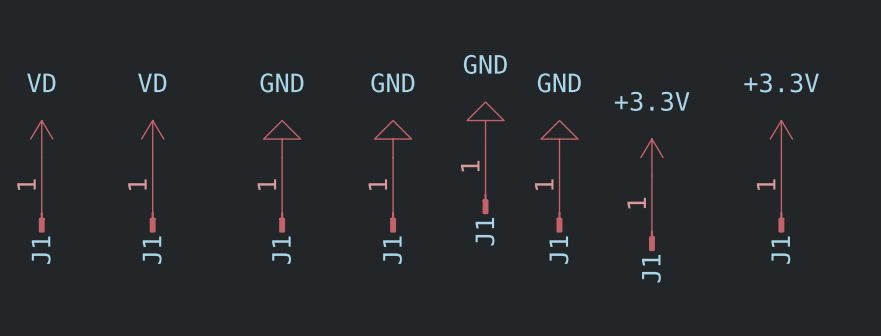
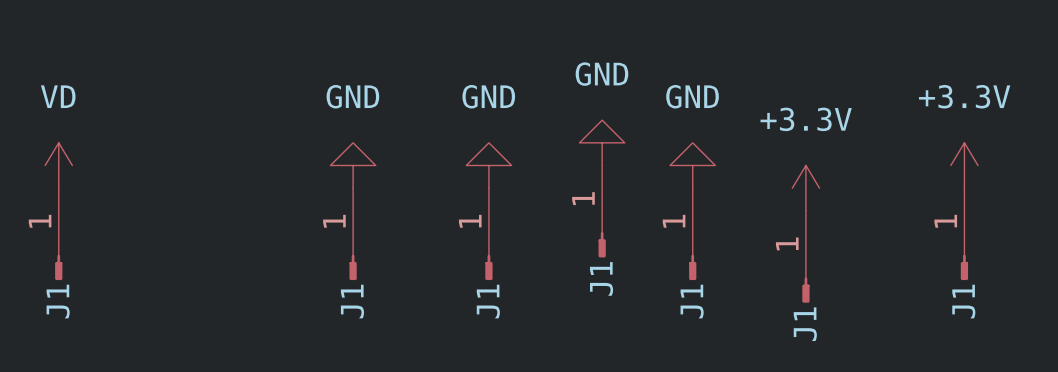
power symbol: VD (152, 139) -> none
J1: (152, 195) -> none

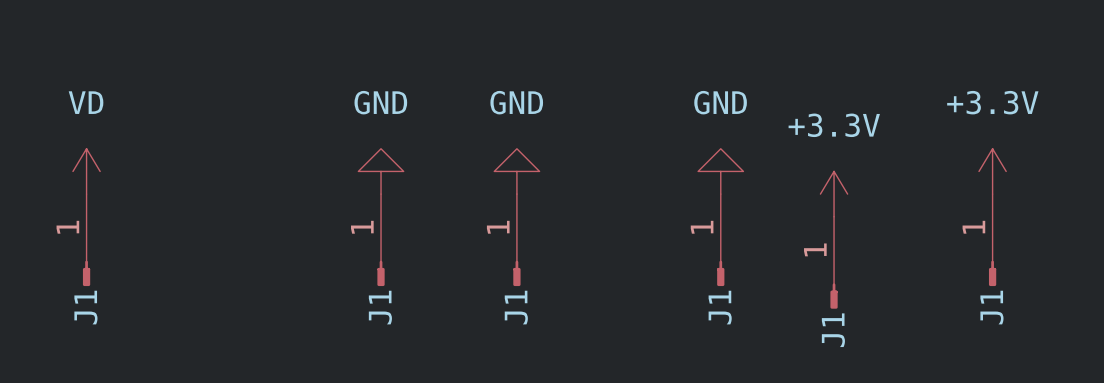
power symbol: GND (602, 142) -> none
J1: (602, 211) -> none

